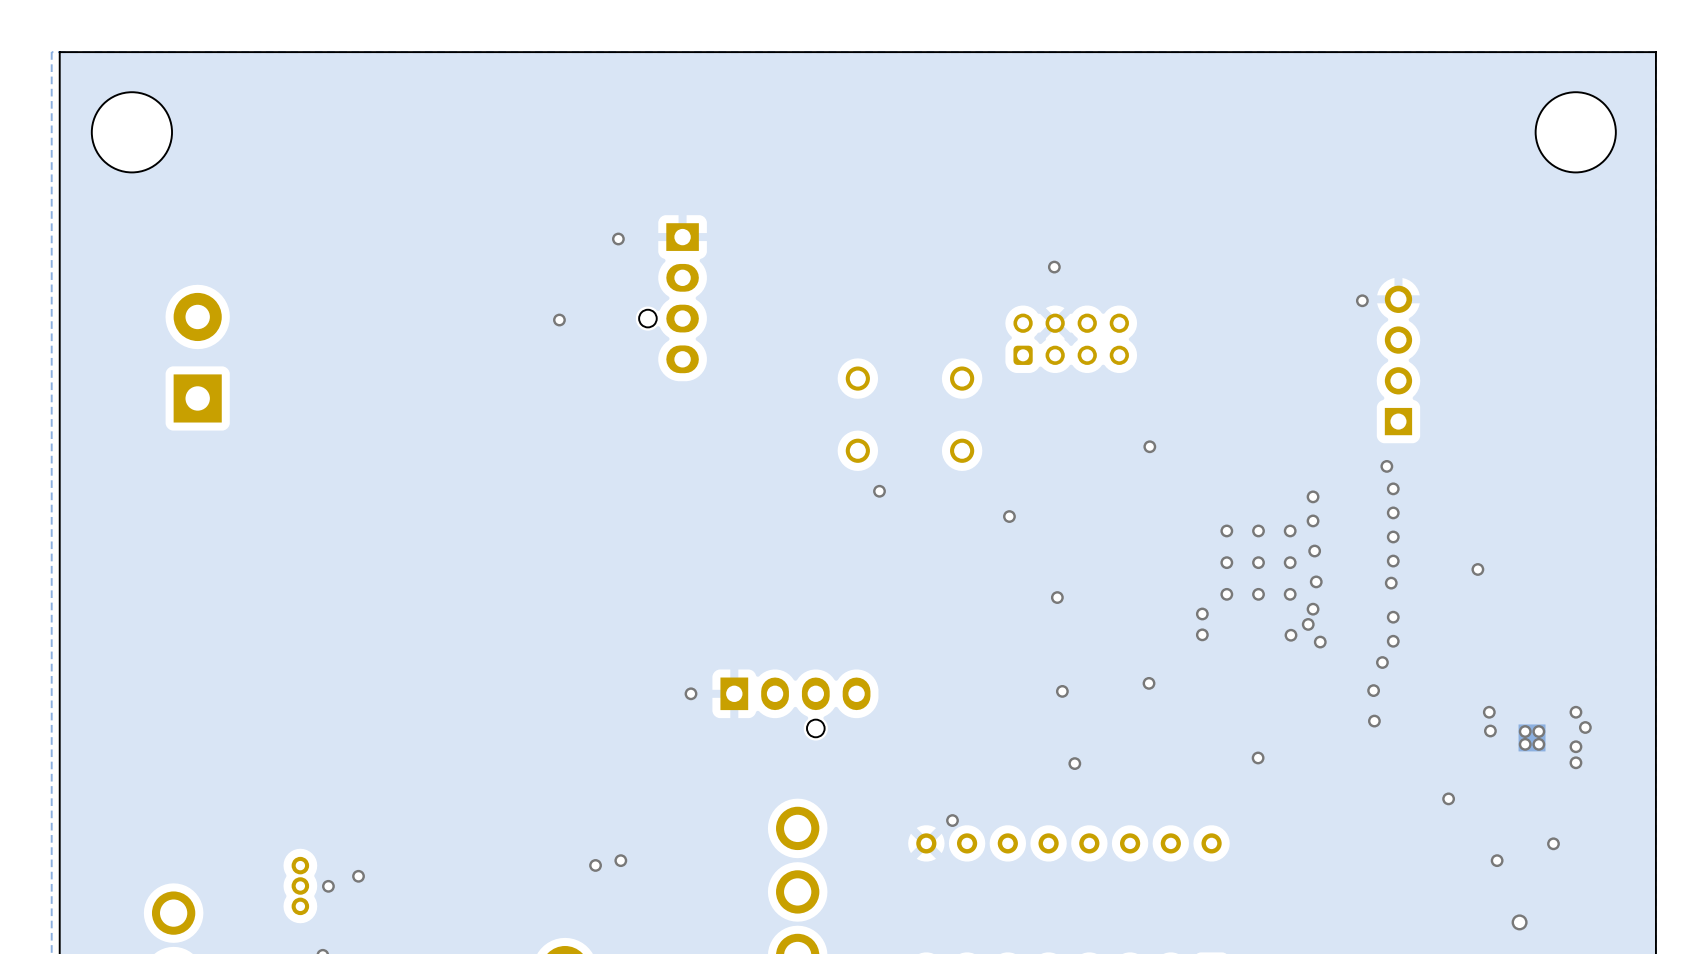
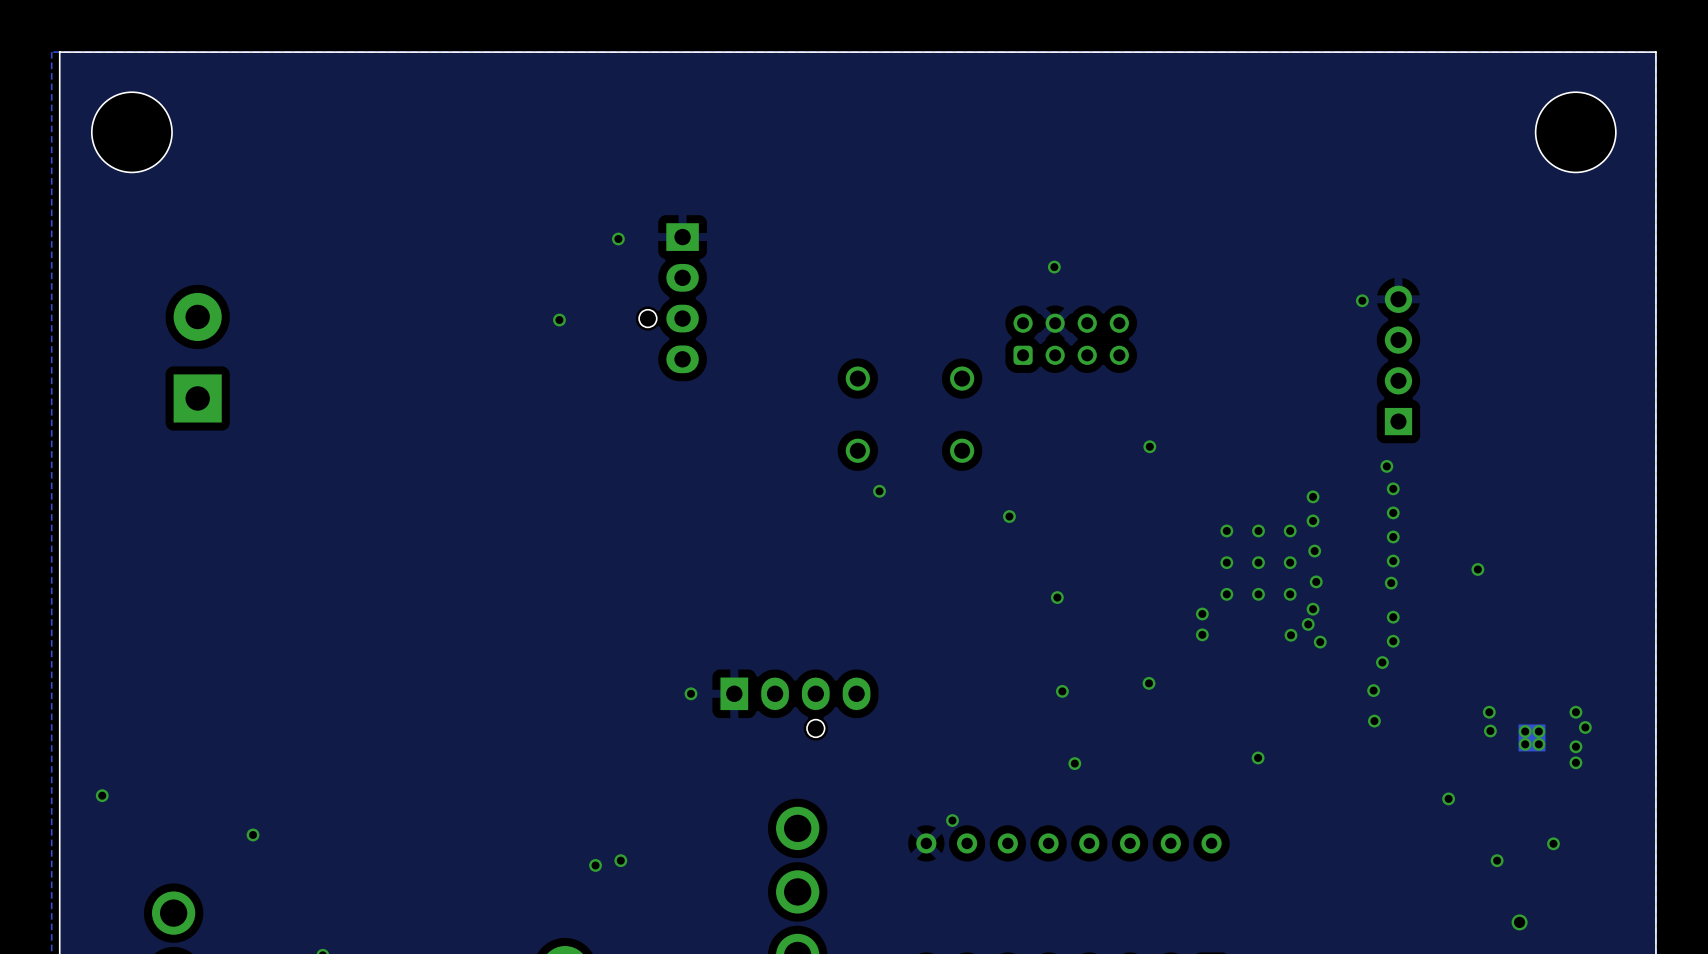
via: none -> (102, 795)
via: none -> (253, 834)
via: (358, 876) -> none
part: (300, 885) -> none
via: (328, 886) -> none

